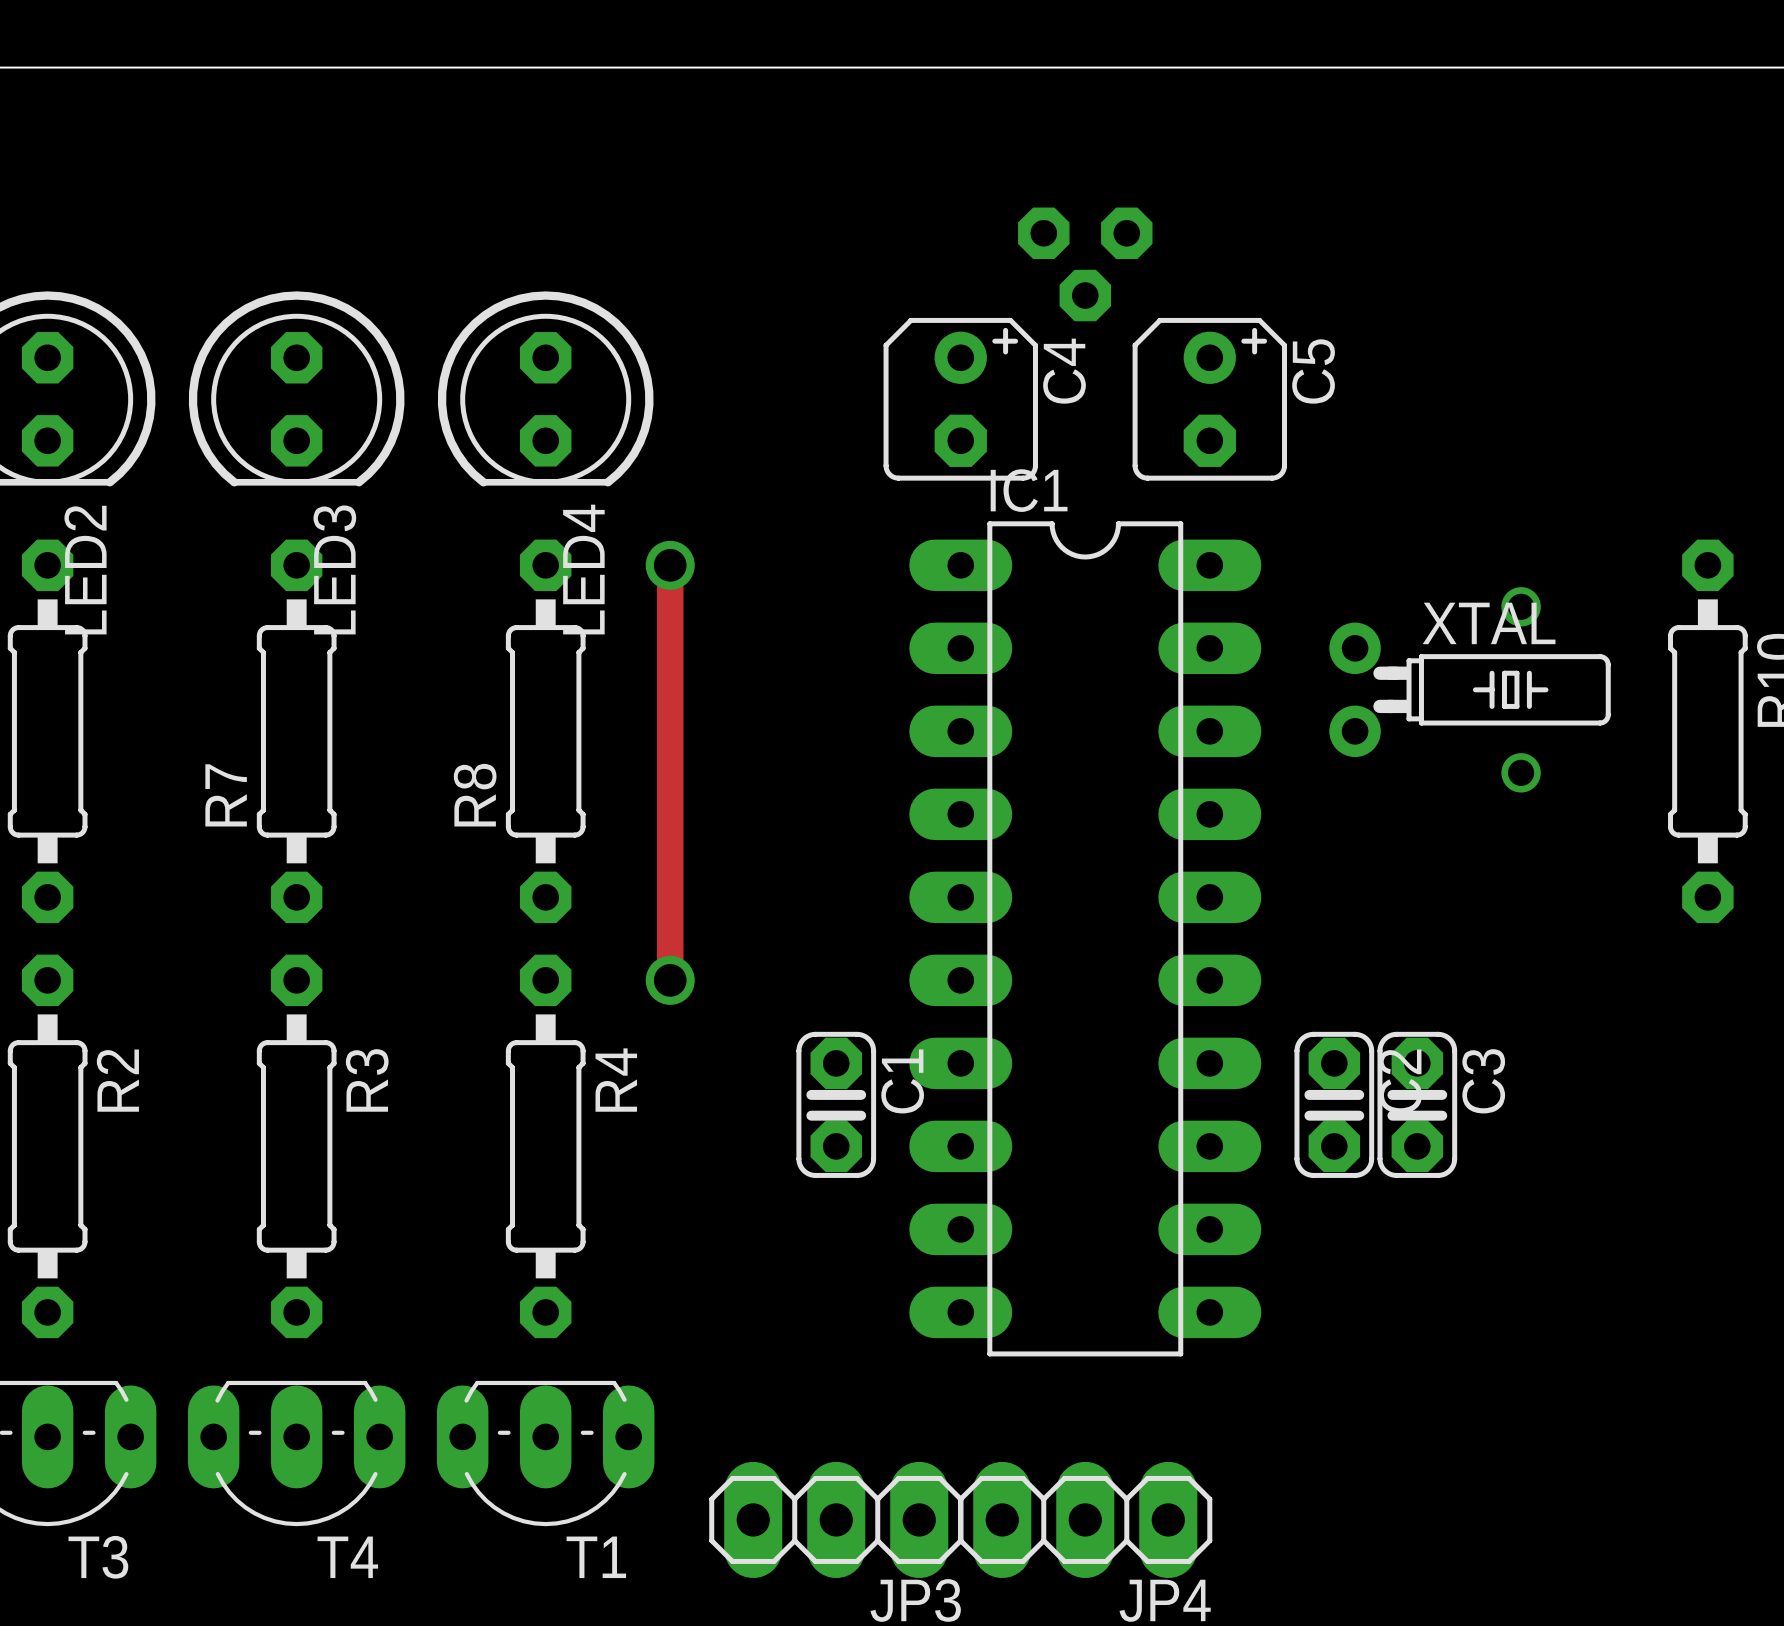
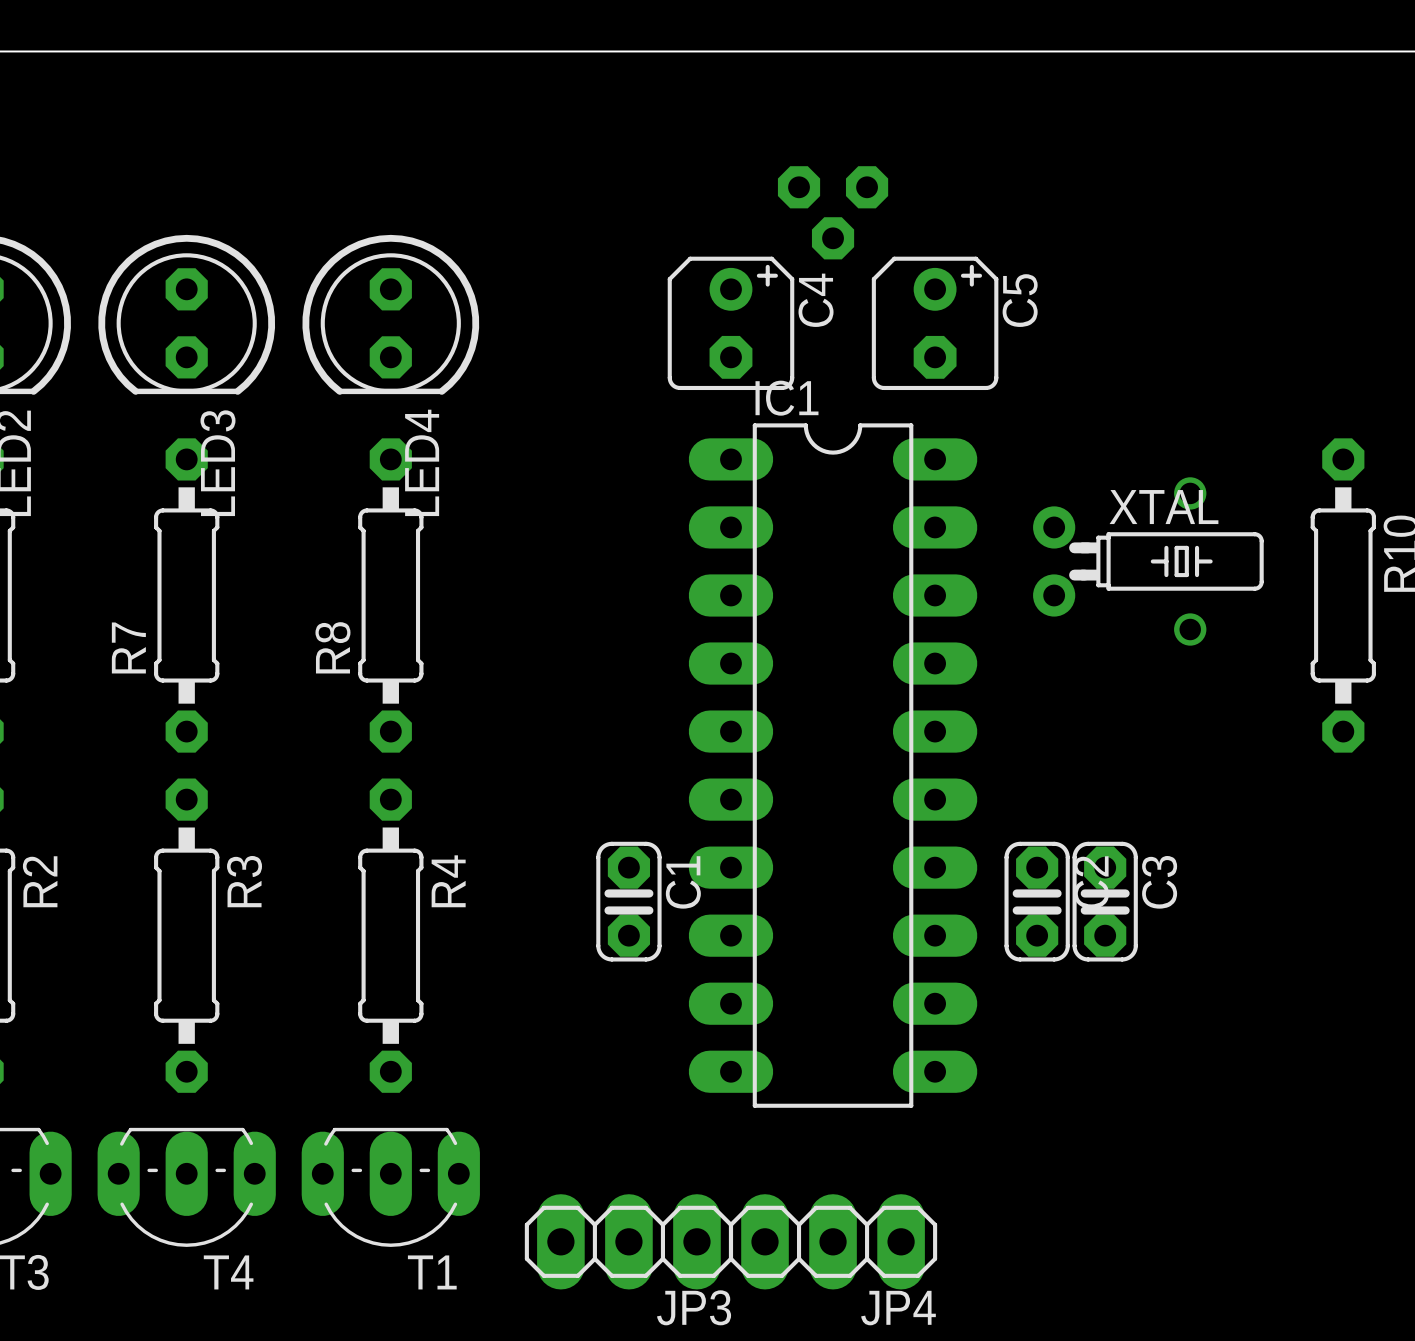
track: (670, 565) (670, 980) -> none
via: (670, 565) -> none
via: (670, 980) -> none

